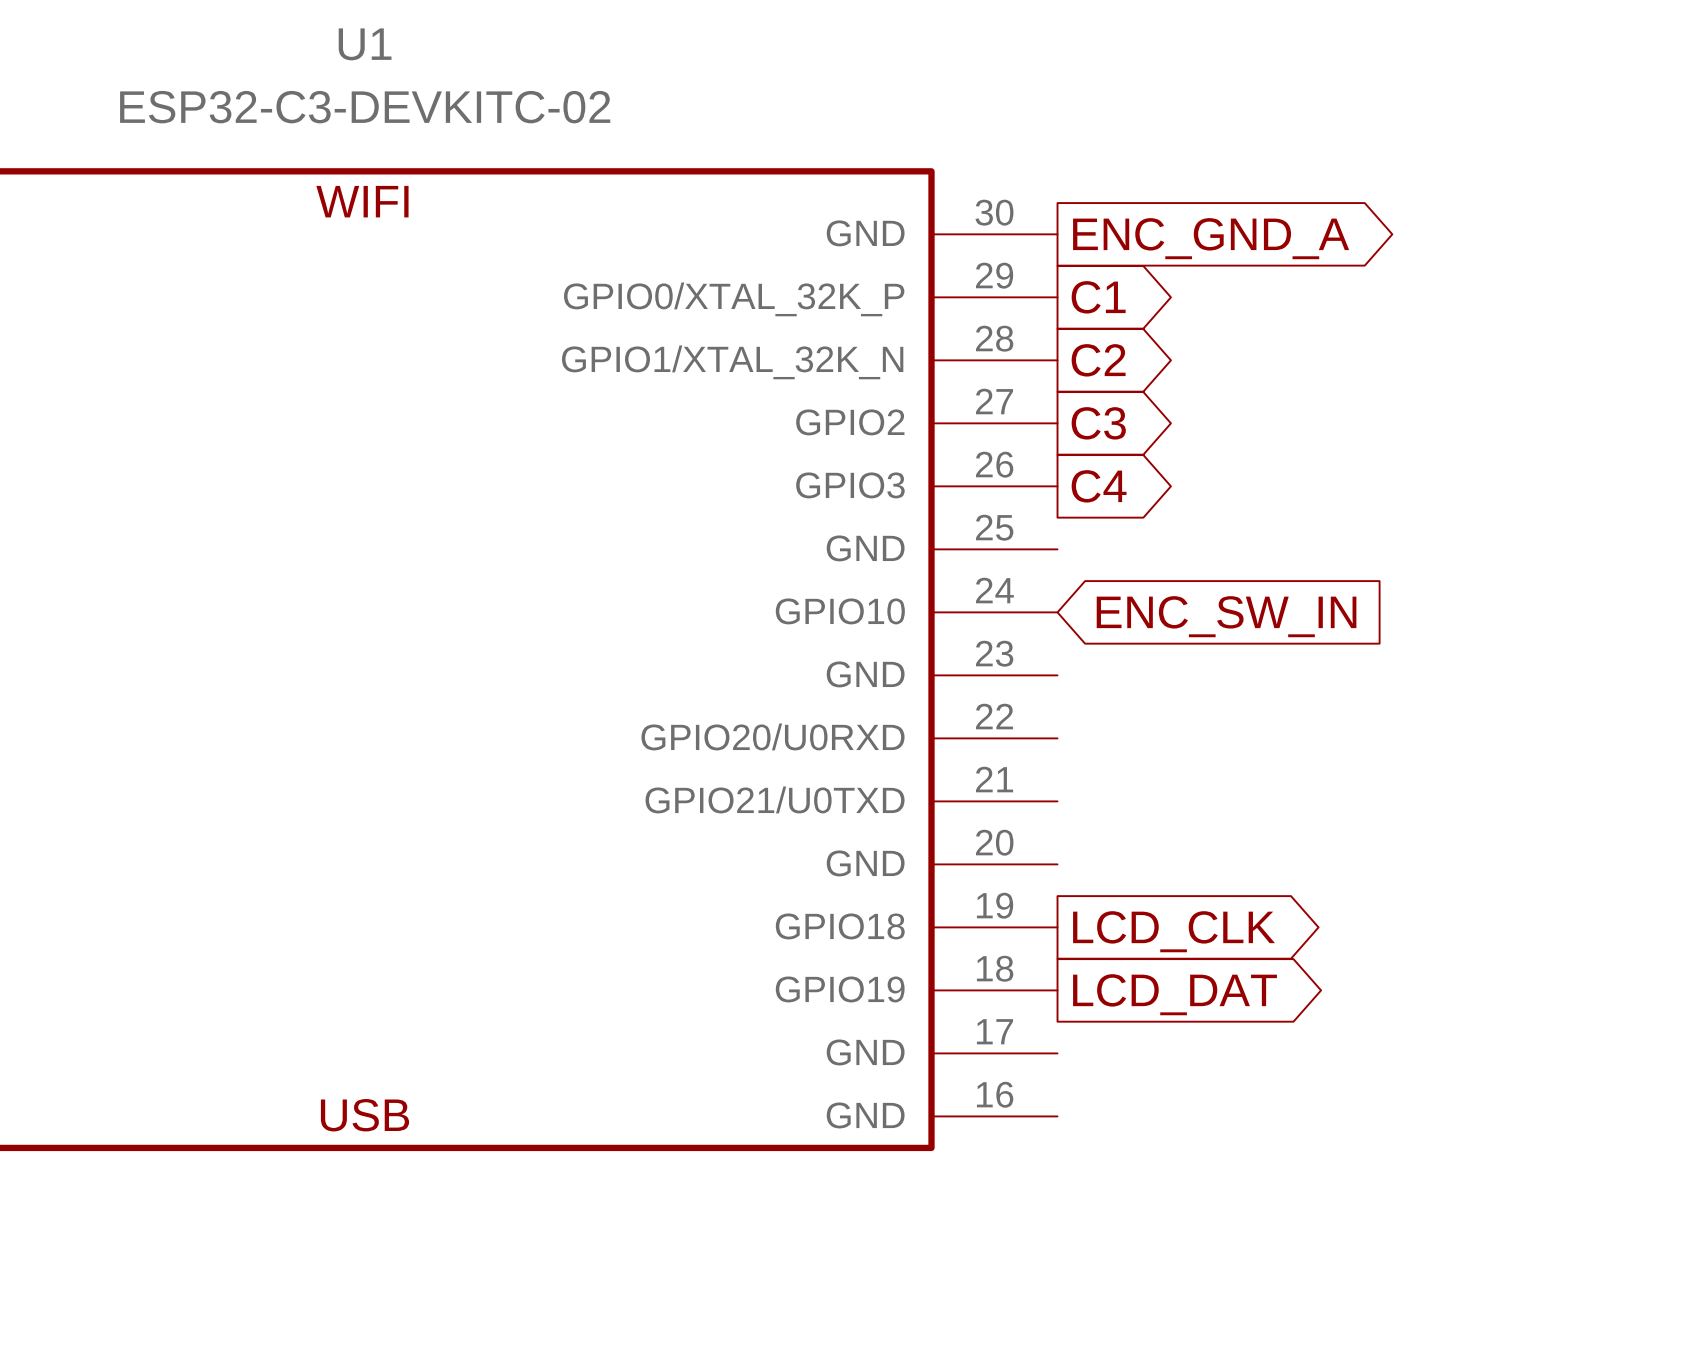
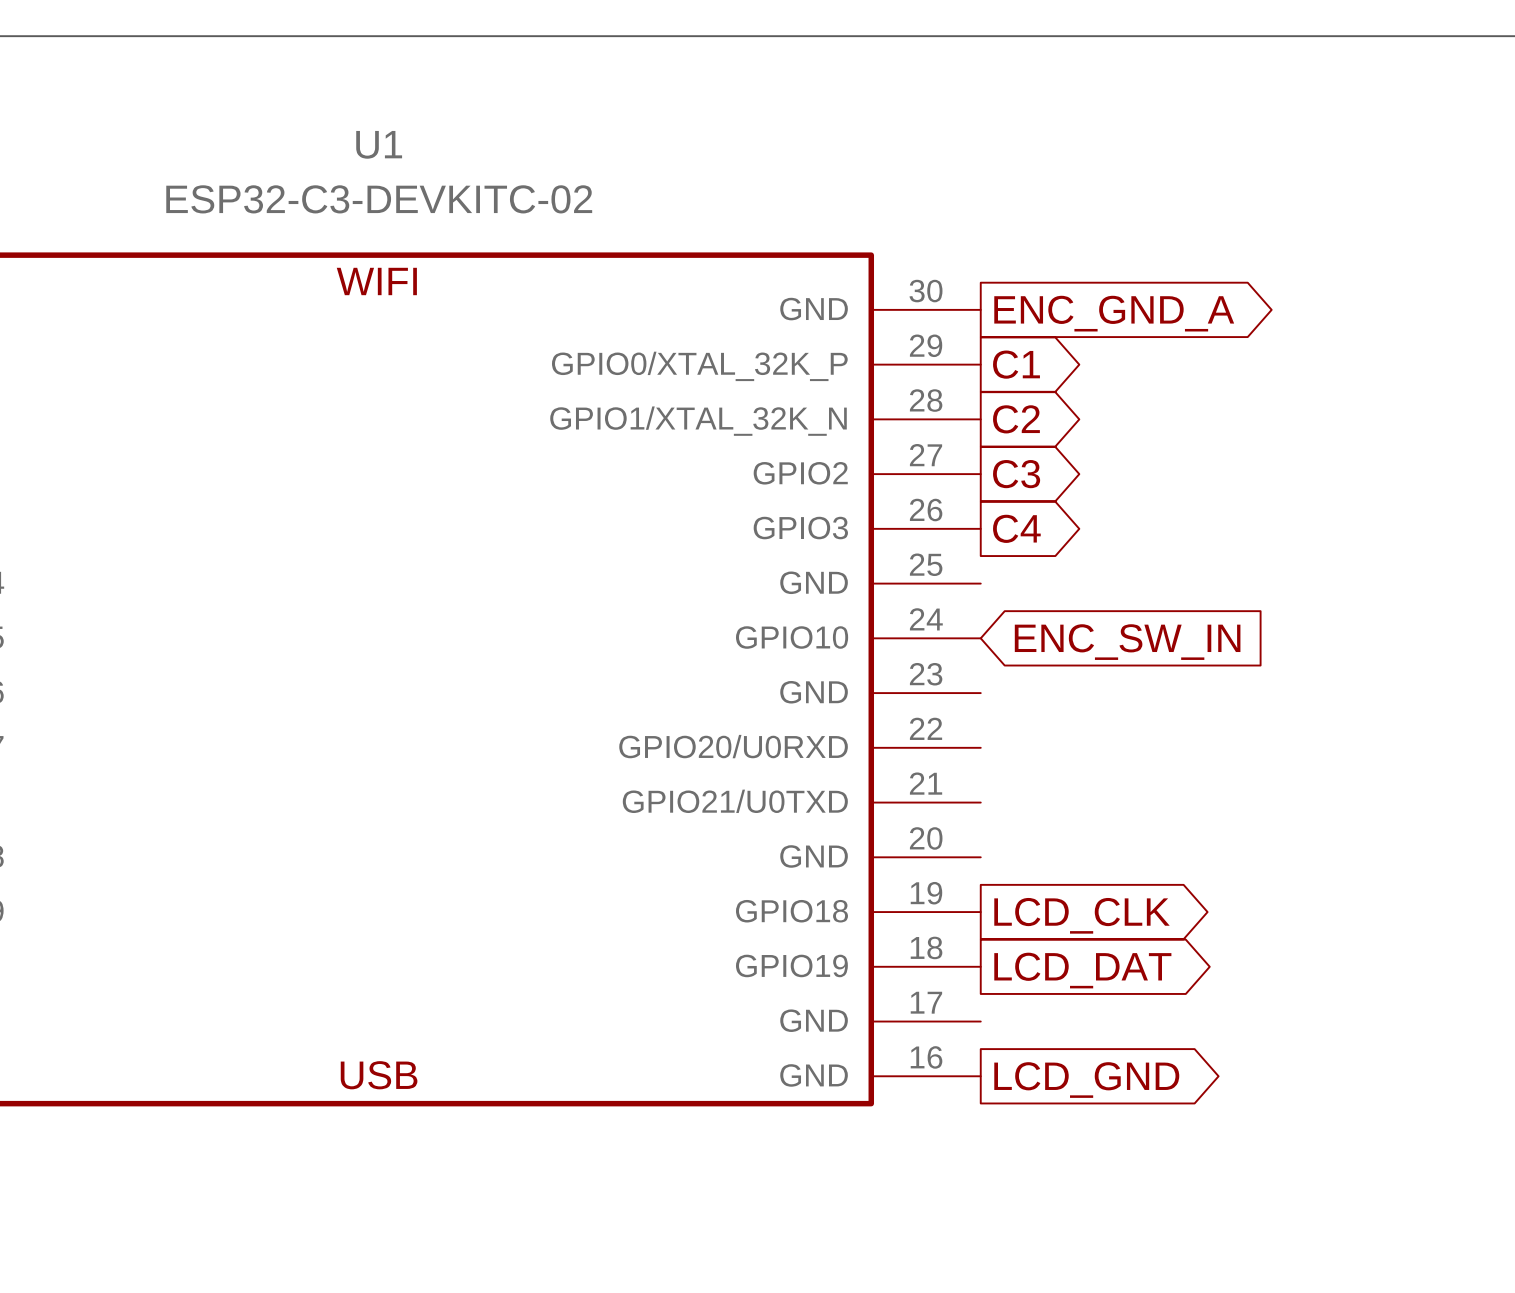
global label: none -> LCD_GND (1086, 1080)

